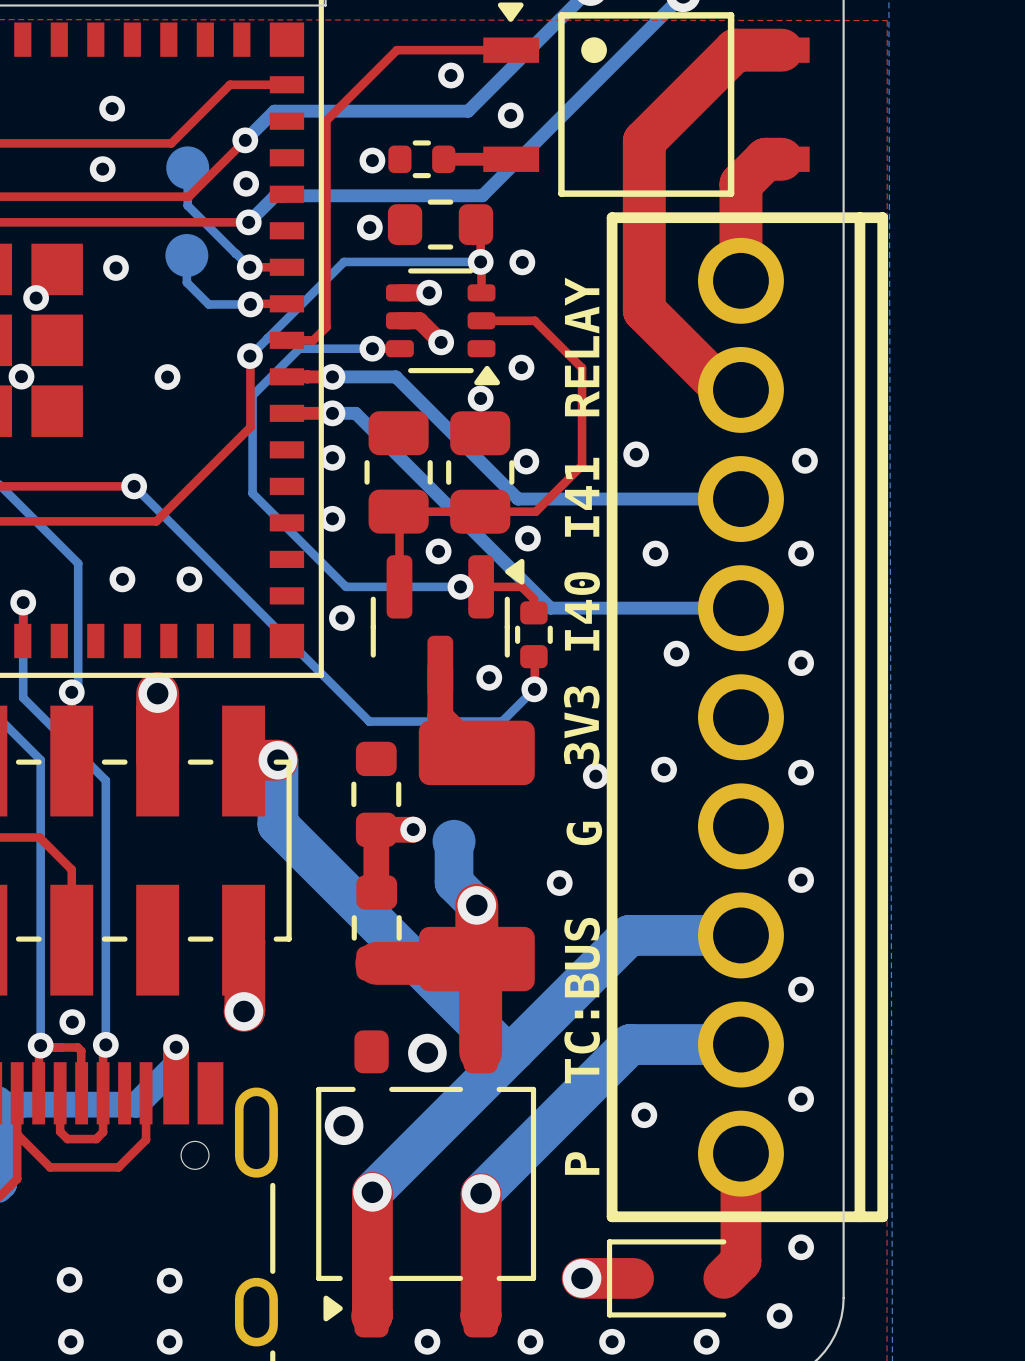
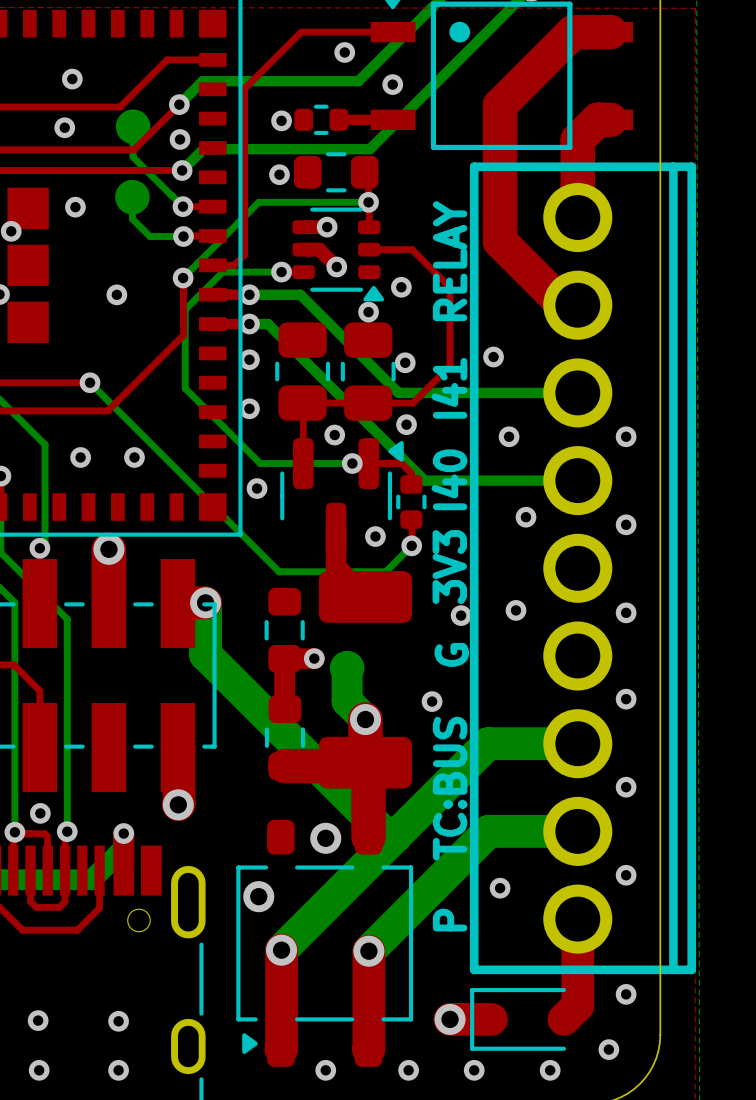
via: (522, 262) -> none
via: (804, 460) -> none

